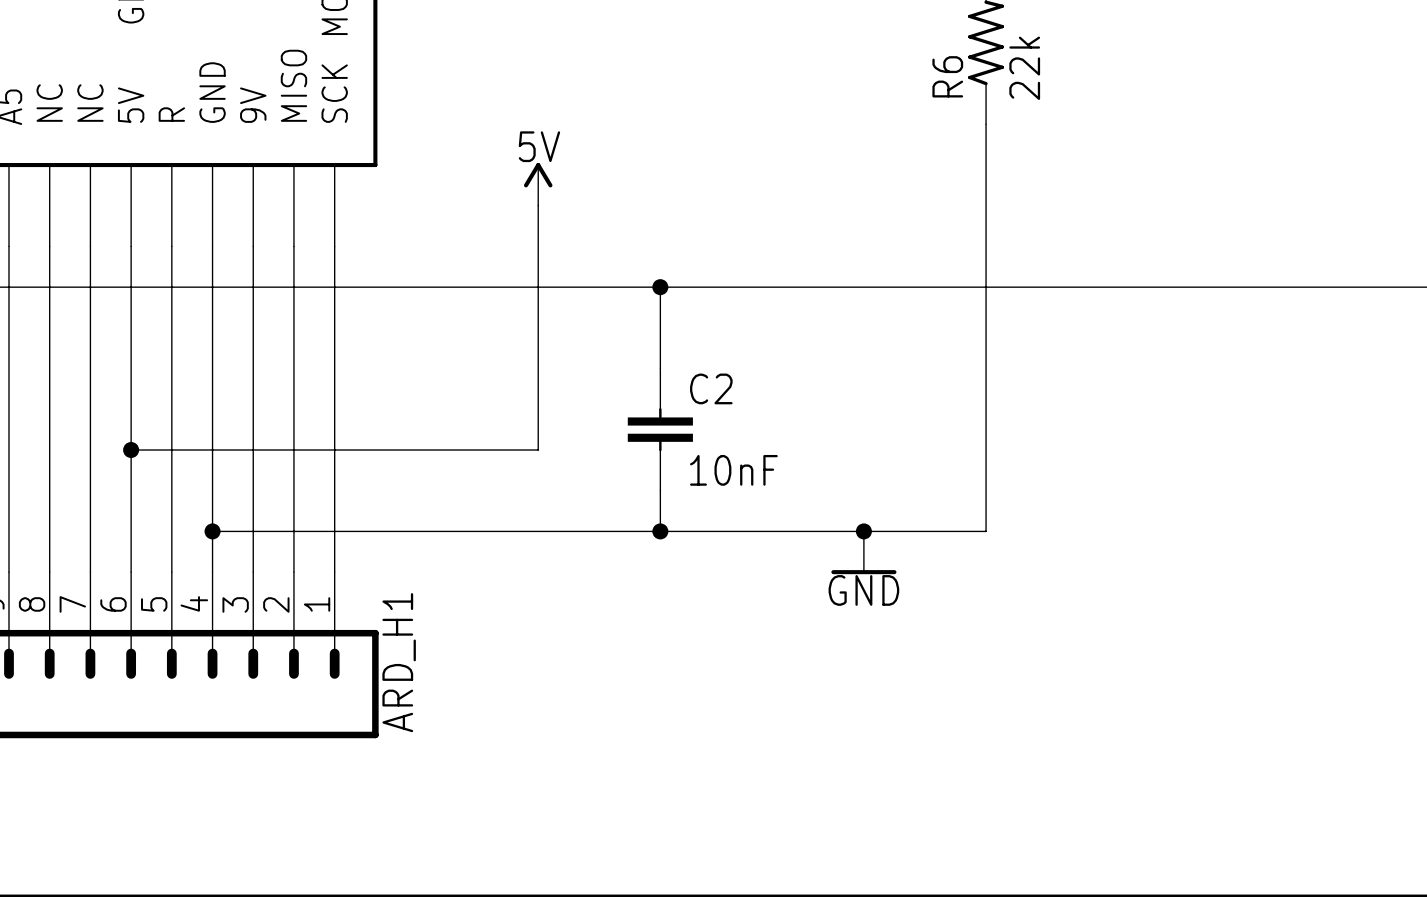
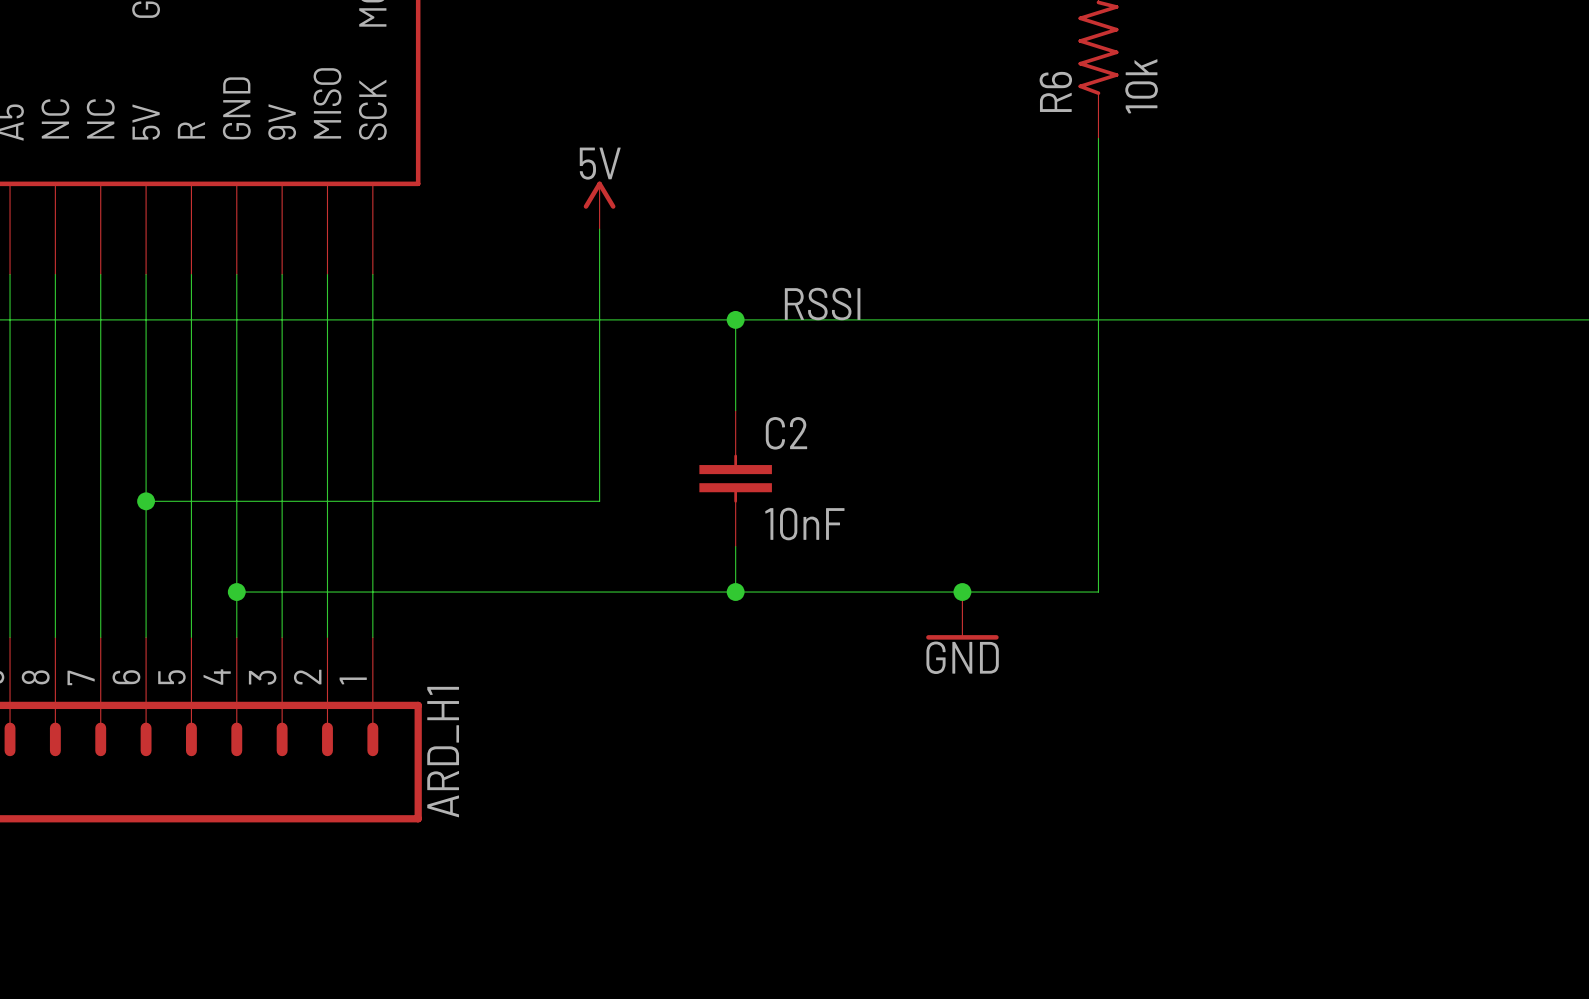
R6 value: 22k (1024, 68) -> 10k (1141, 86)
label: none -> RSSI (822, 304)

